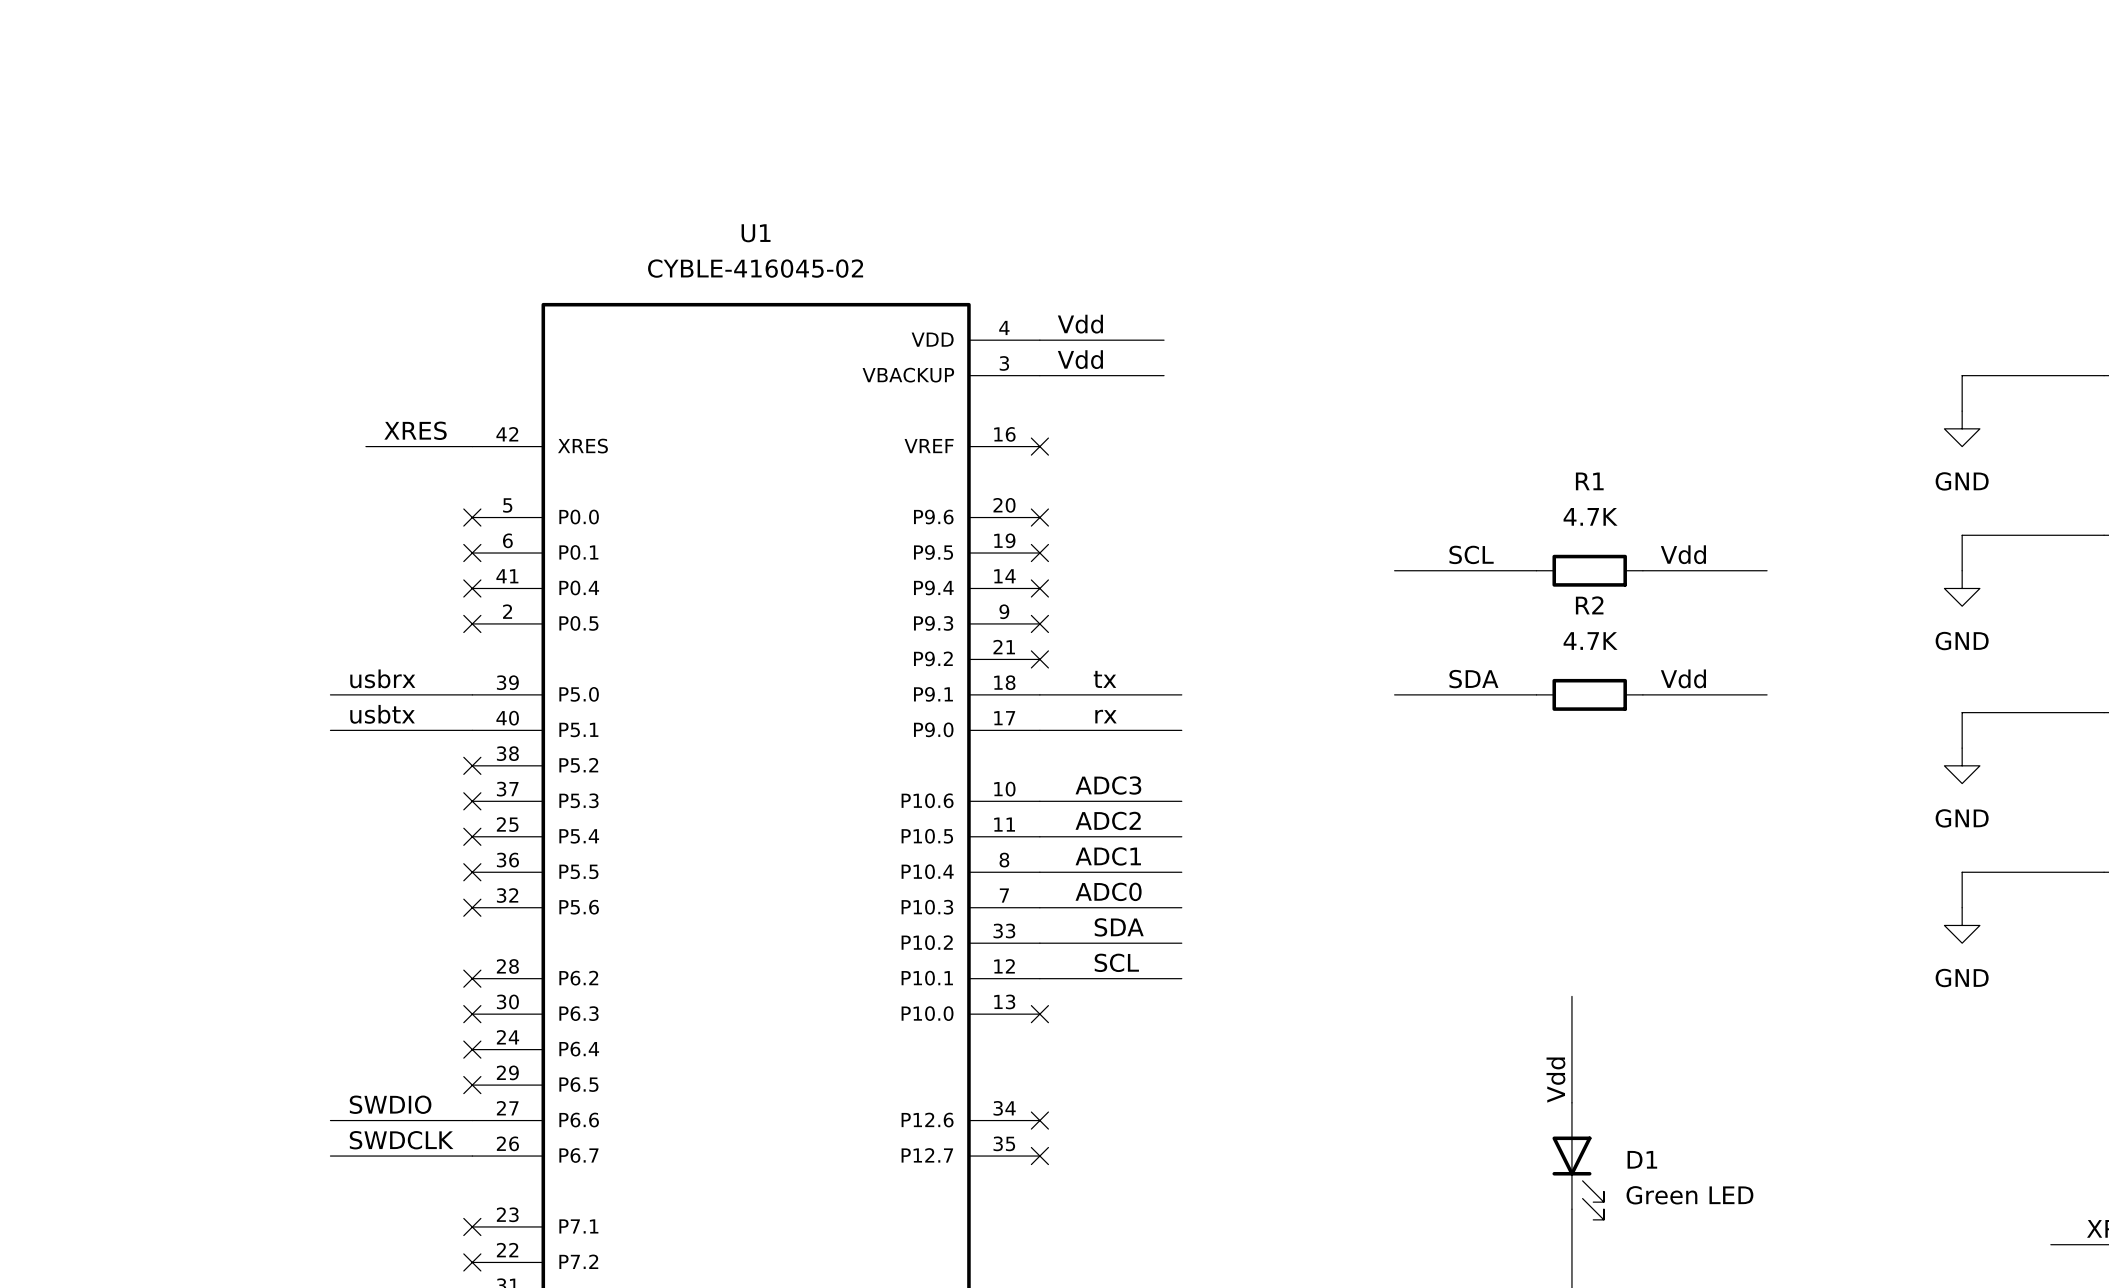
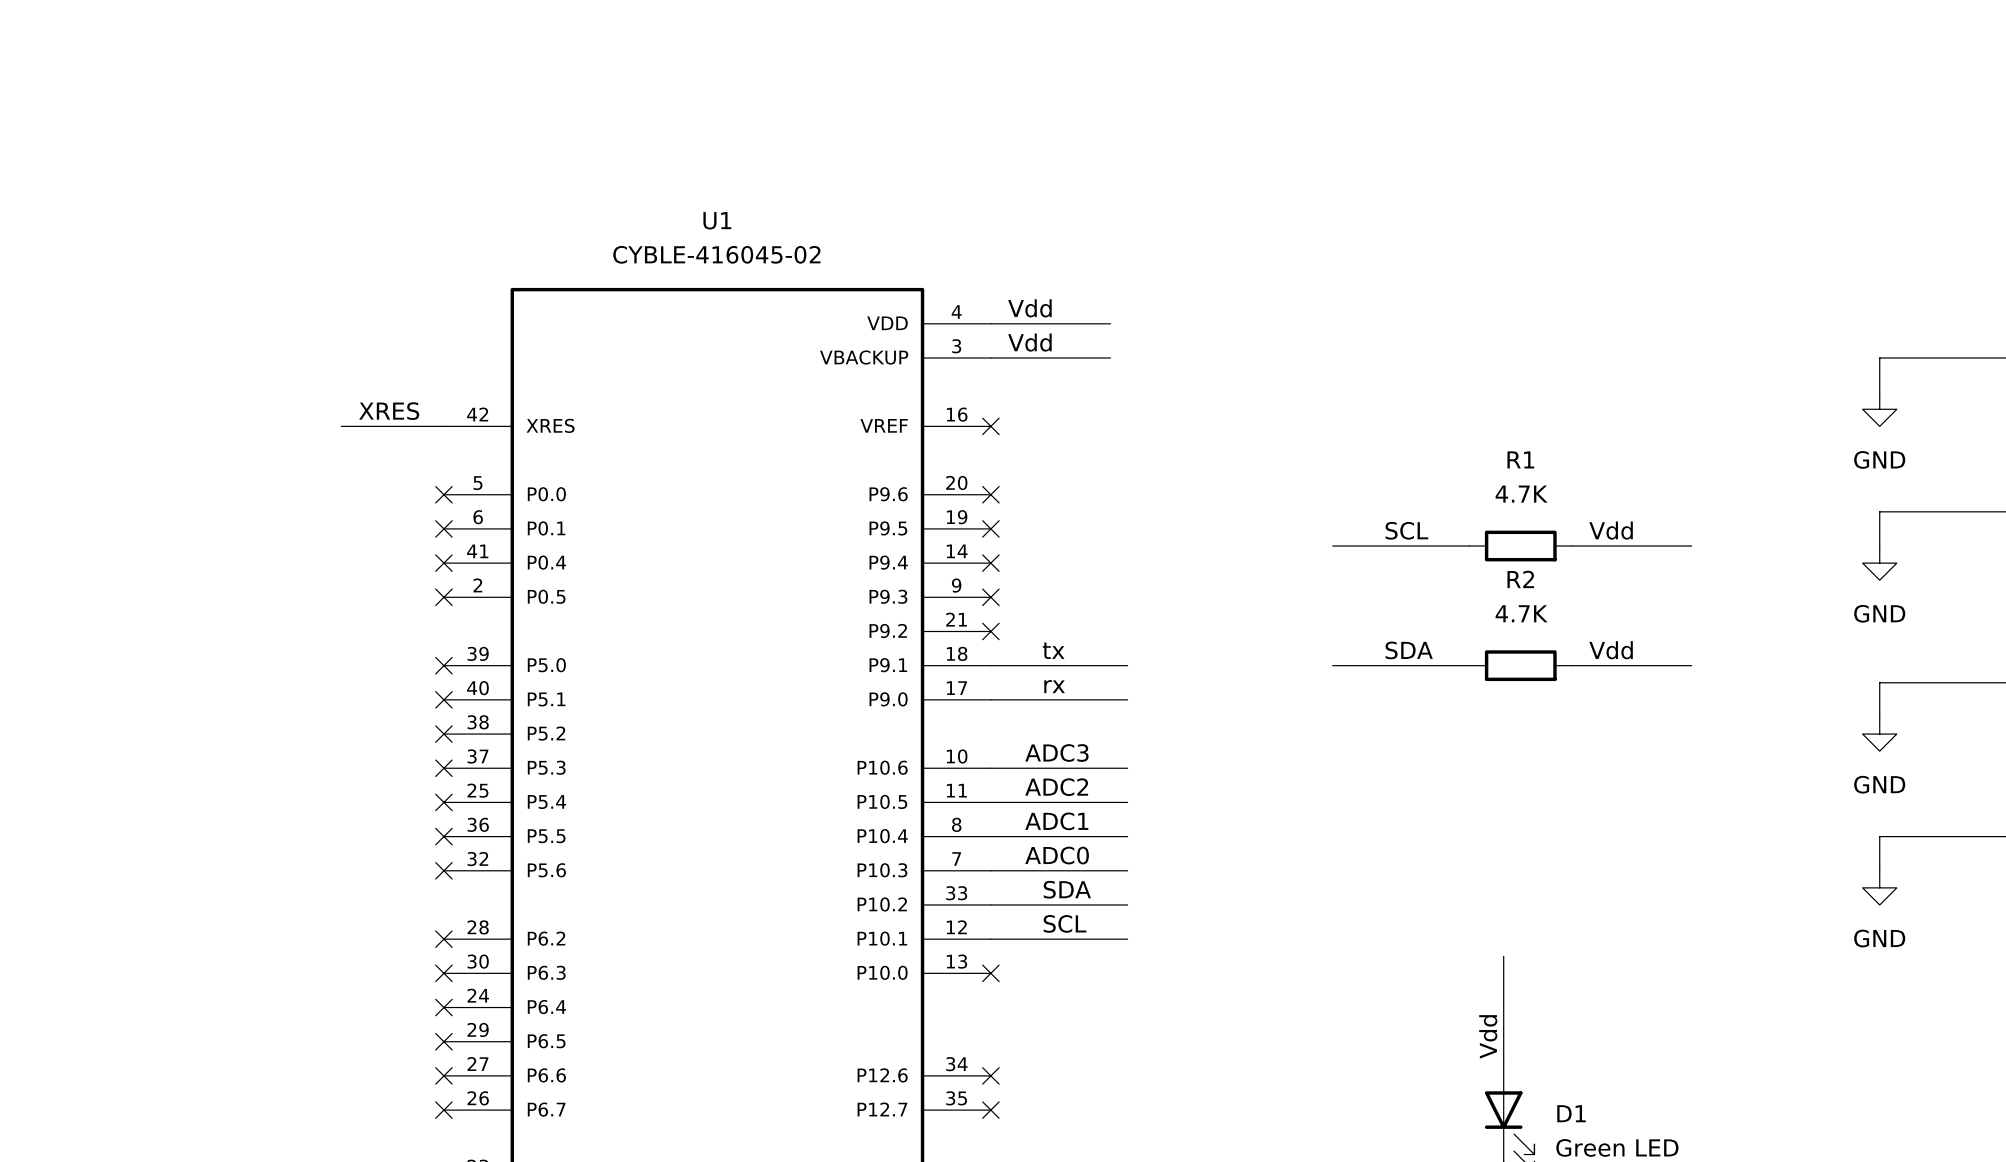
label: usbrx (382, 678) -> none
wire: (330, 694) (472, 694) -> none
no-connect mark: none -> (443, 665)
label: usbtx (382, 714) -> none
wire: (330, 730) (472, 730) -> none
no-connect mark: none -> (443, 699)
label: SWDIO (390, 1104) -> none
wire: (330, 1120) (472, 1120) -> none
no-connect mark: none -> (443, 1075)
label: SWDCLK (401, 1140) -> none
wire: (330, 1156) (472, 1156) -> none
no-connect mark: none -> (443, 1110)

